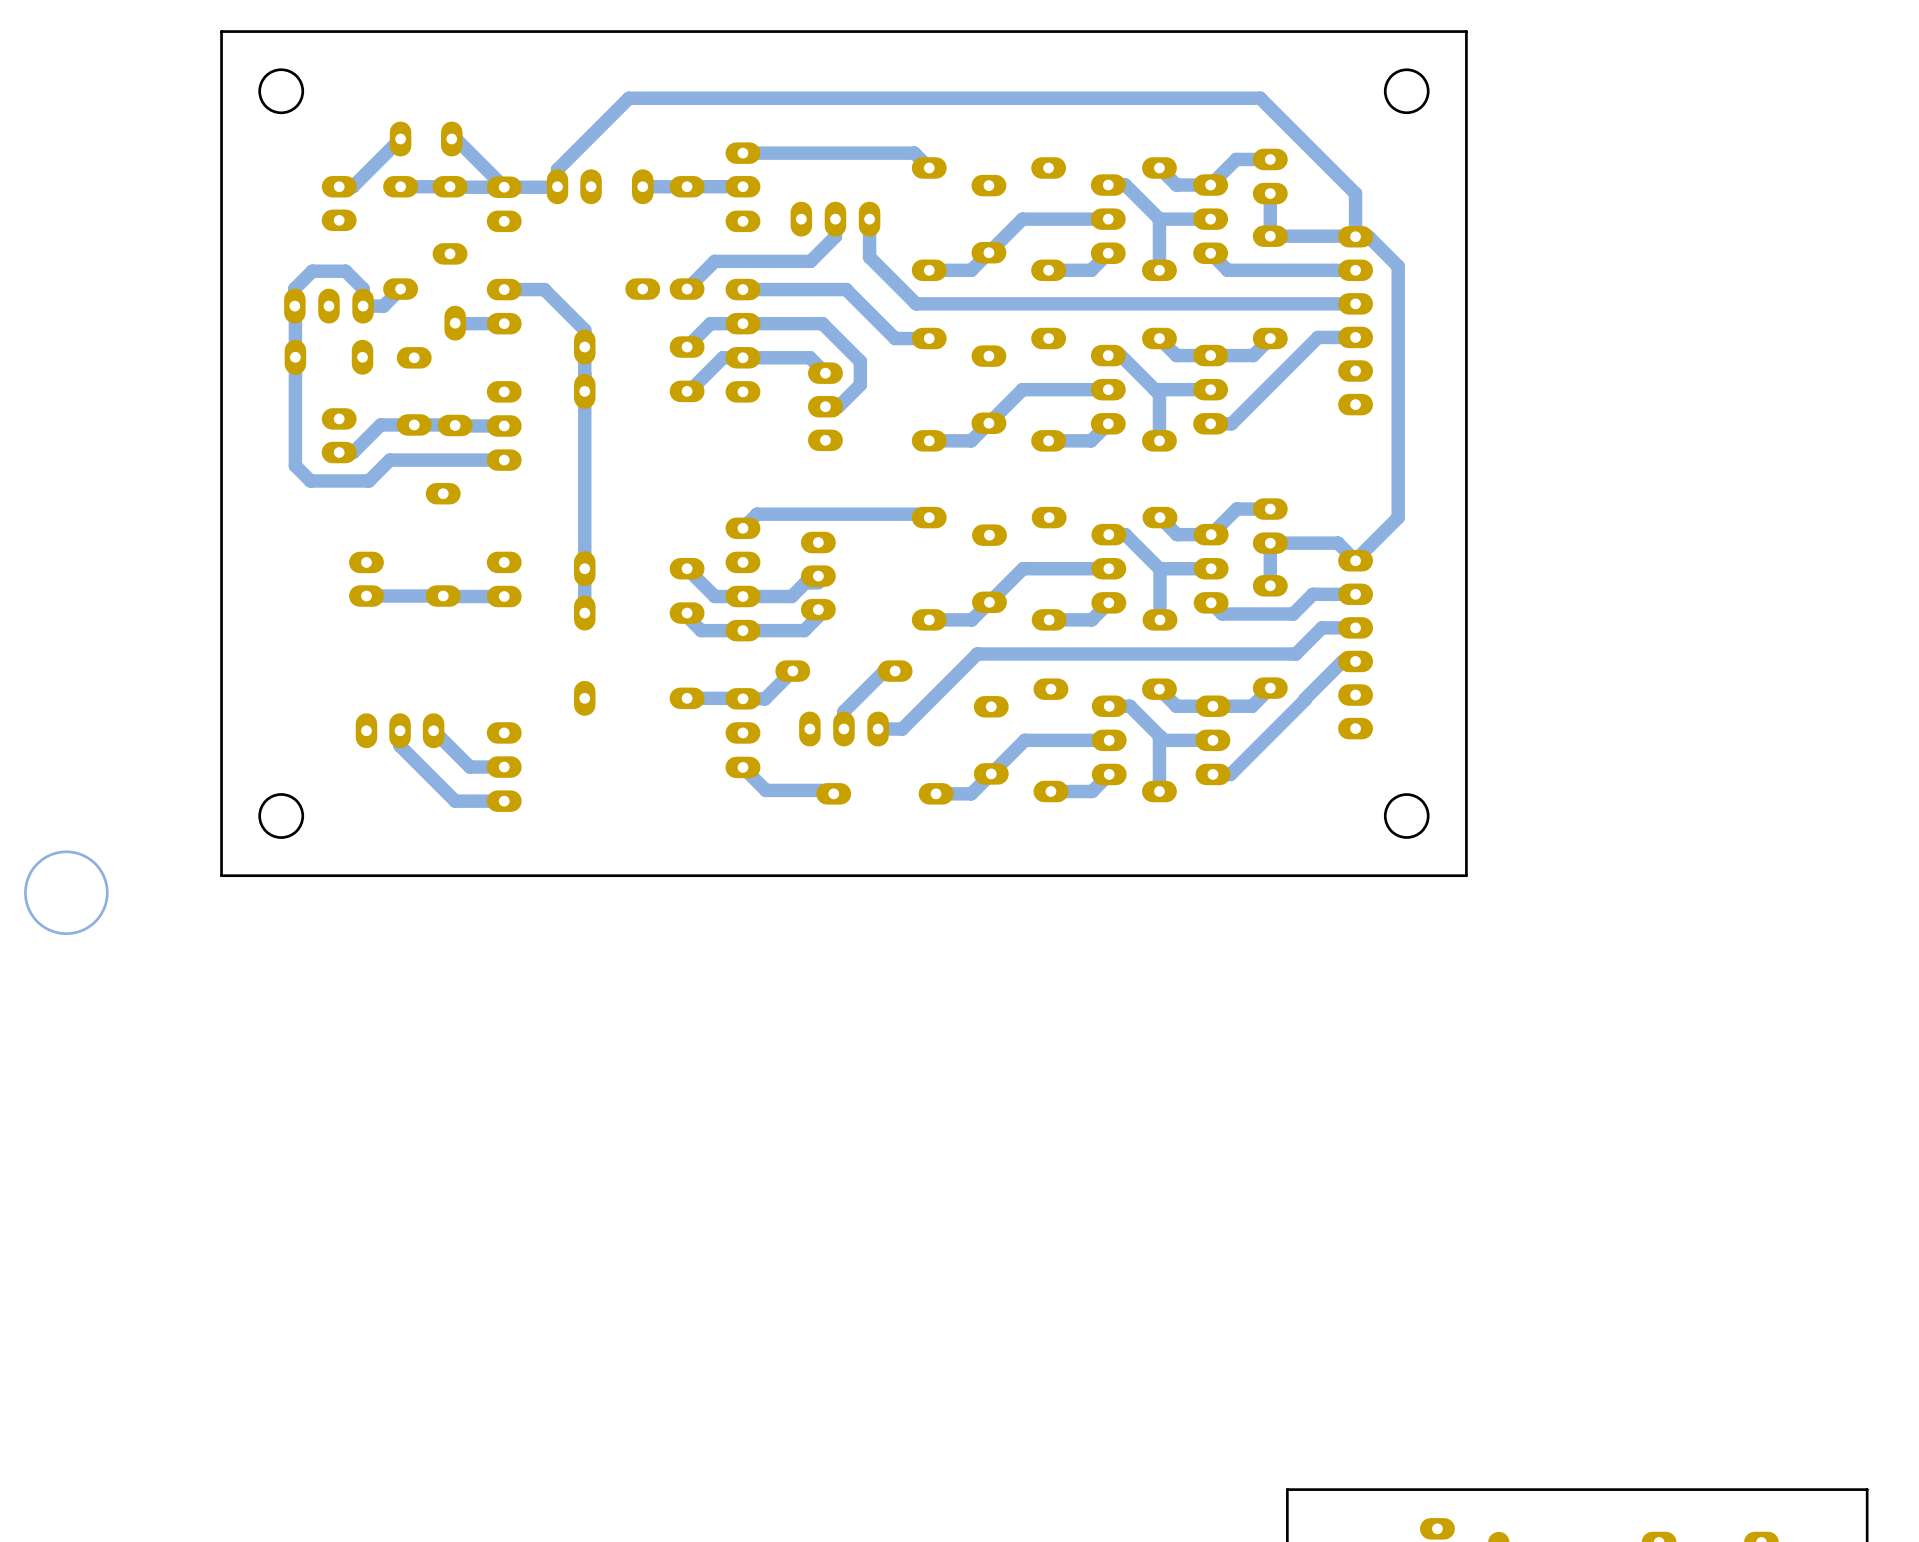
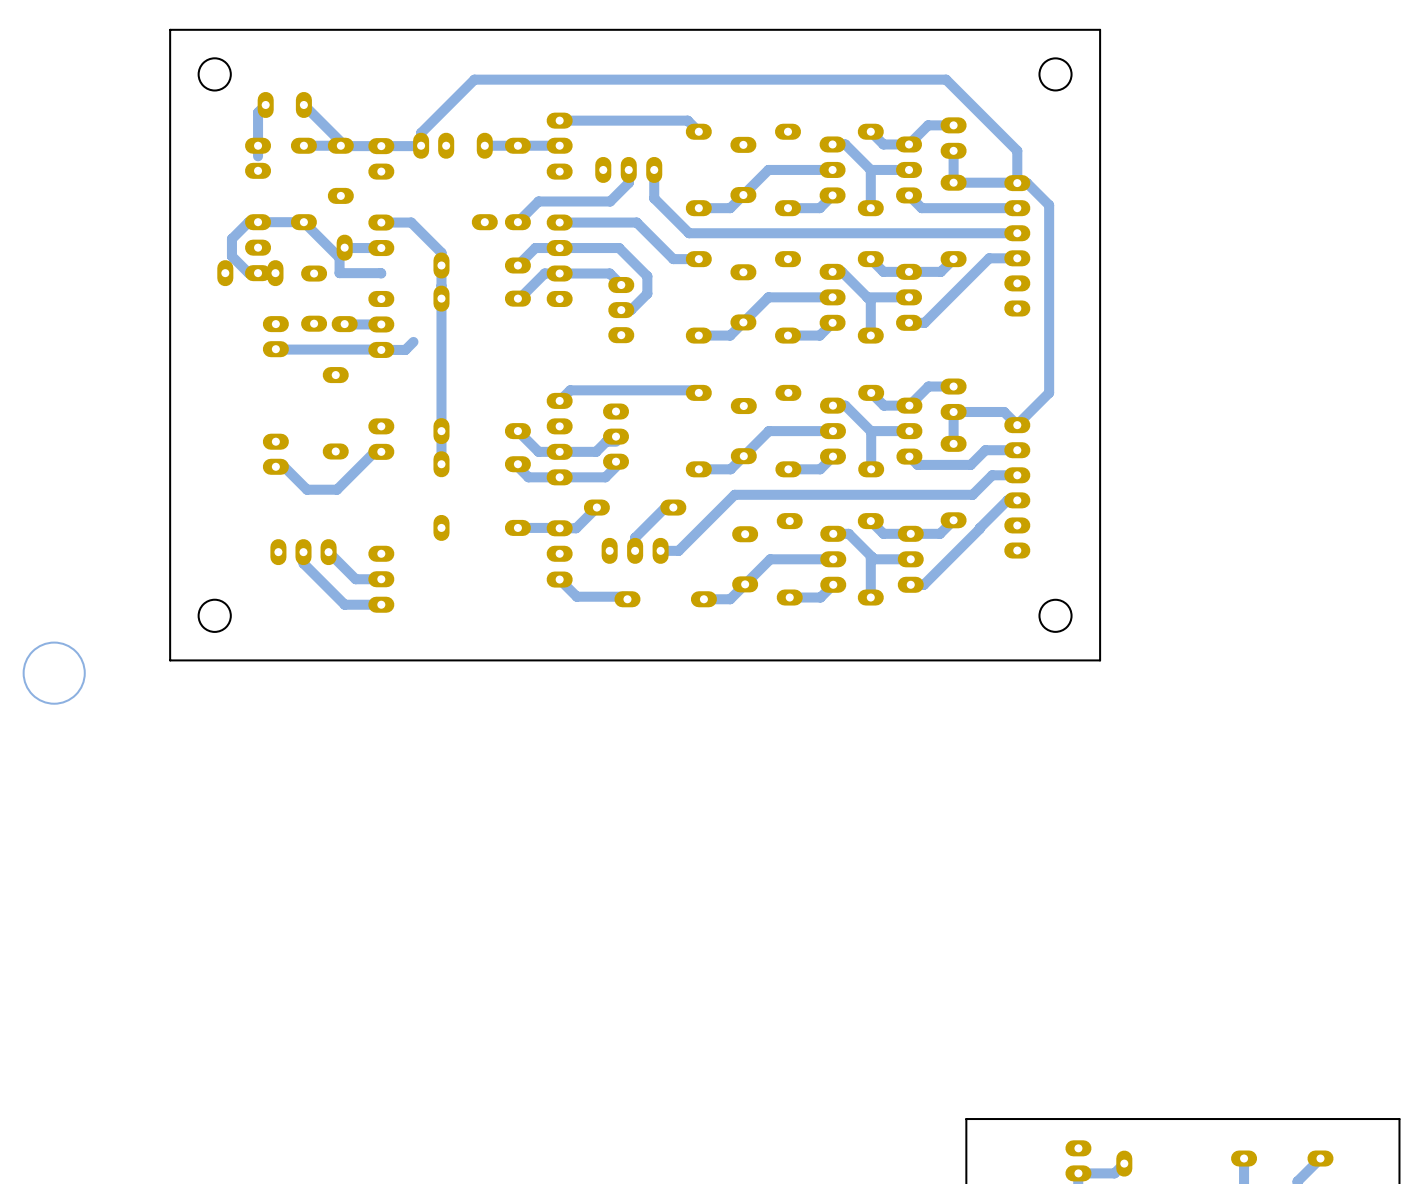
bottom track: none -> (265, 104) (258, 112) (258, 156)
bottom track: none -> (303, 104) (345, 146)
bottom track: (400, 139) (352, 186) (339, 186) -> none
part position: (426, 139) -> (284, 104)
bottom track: (451, 139) (455, 139) (504, 187) -> none
bottom track: (400, 289) (383, 306) (363, 306) (363, 288) (345, 271) (312, 271) (294, 288) (294, 306) -> none
bottom track: (295, 306) (295, 465) (310, 480) (368, 480) (389, 460) (504, 460) -> none
part rotation: 0° (328, 306) -> 90° clockwise (258, 247)
bottom track: none -> (258, 273) (248, 273) (231, 256) (231, 238) (248, 222) (303, 222) (339, 257) (339, 273) (381, 273)
bottom track: (454, 424) (380, 424) (353, 452) (339, 452) -> none
part position: (339, 435) -> (275, 336)
bottom track: none -> (413, 341) (405, 349) (275, 349)
part position: (366, 579) -> (275, 454)
bottom track: (443, 596) (366, 596) -> none
bottom track: (495, 596) (443, 596) -> (374, 451) (337, 489) (307, 489) (283, 466)

